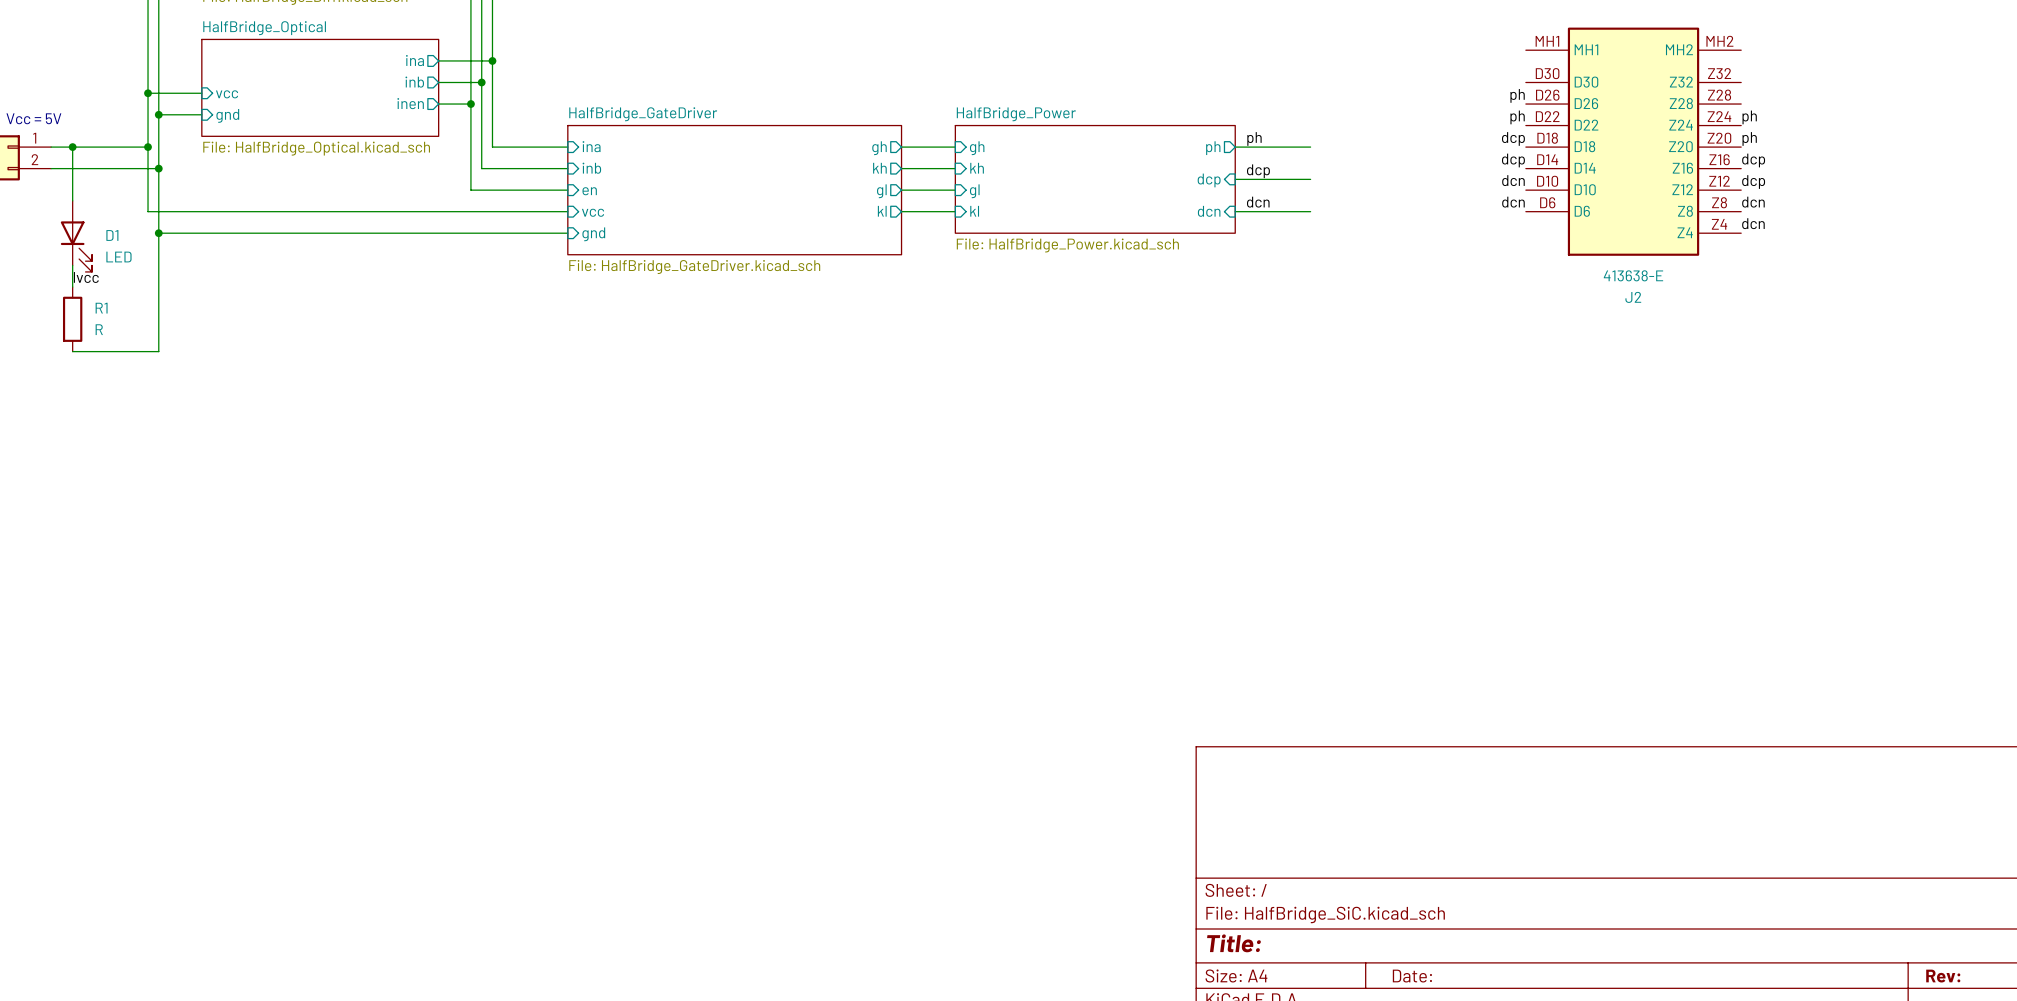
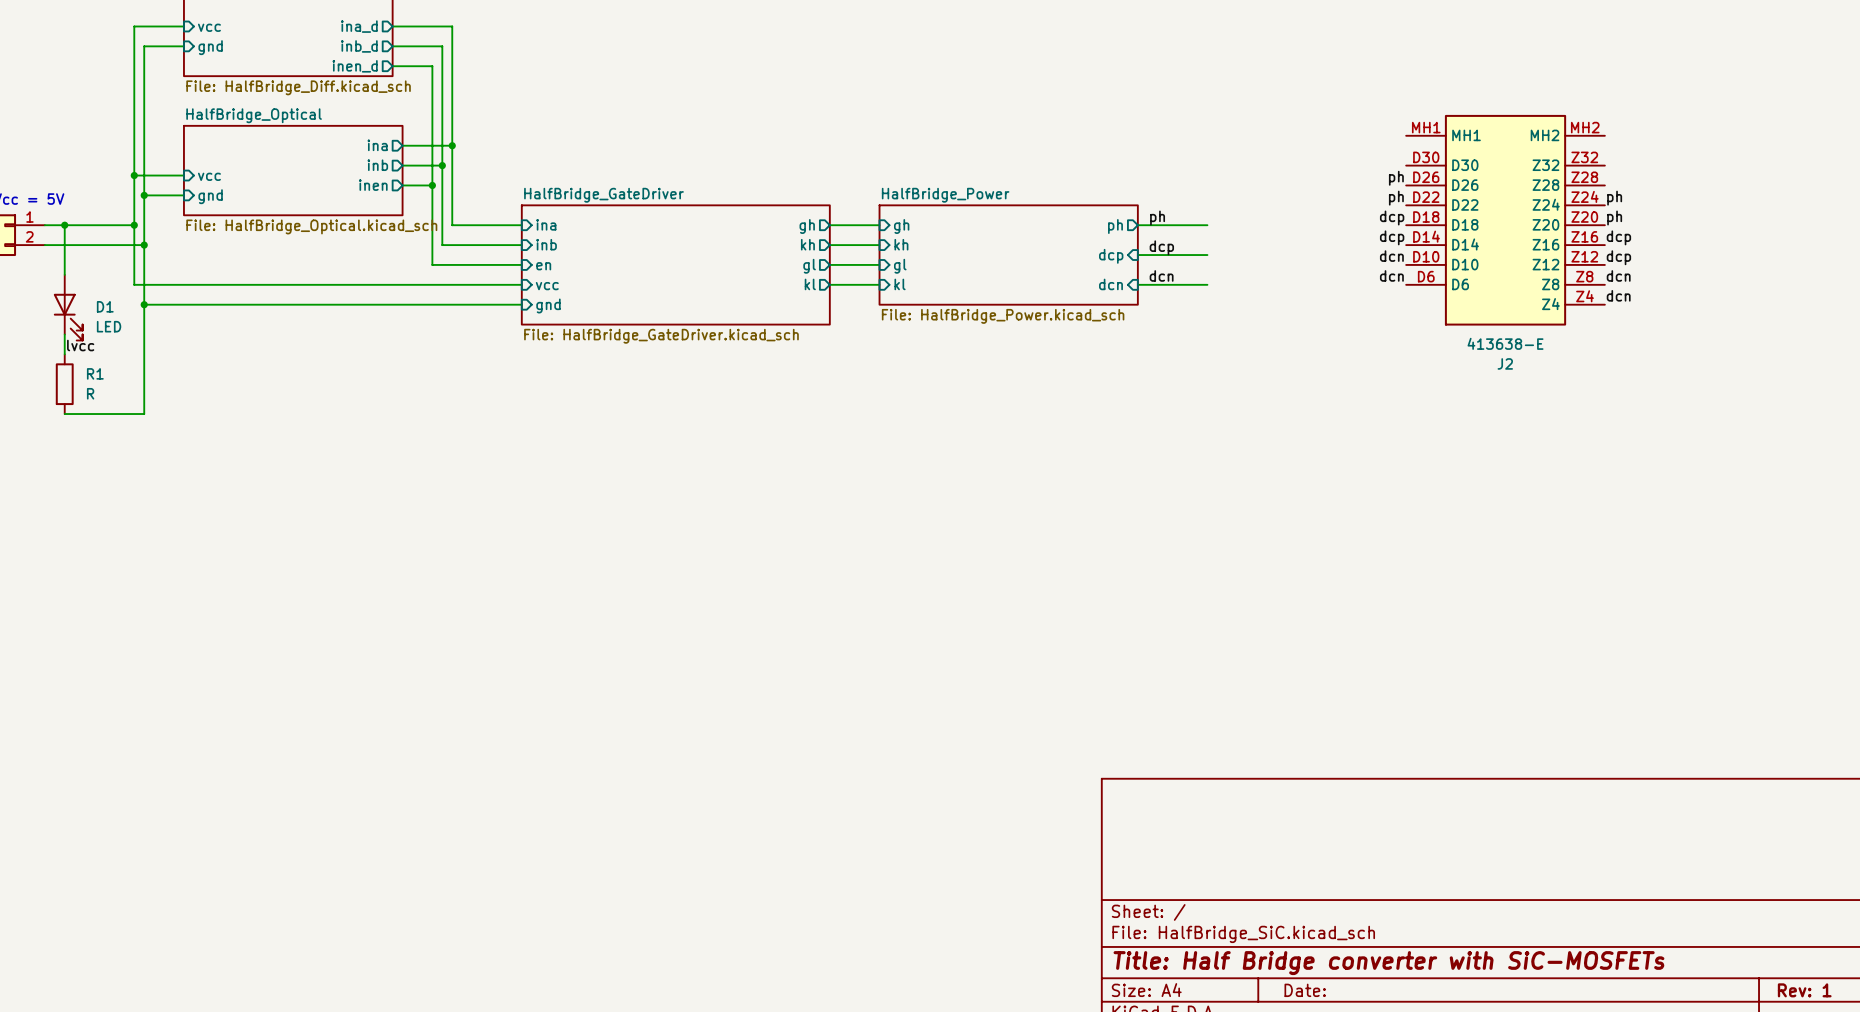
title block: Title: (1234, 943) -> Title: Half Bridge converter with SiC-MOSFETs (1388, 963)
title block: Rev: (1943, 976) -> Rev: 1 (1804, 990)

